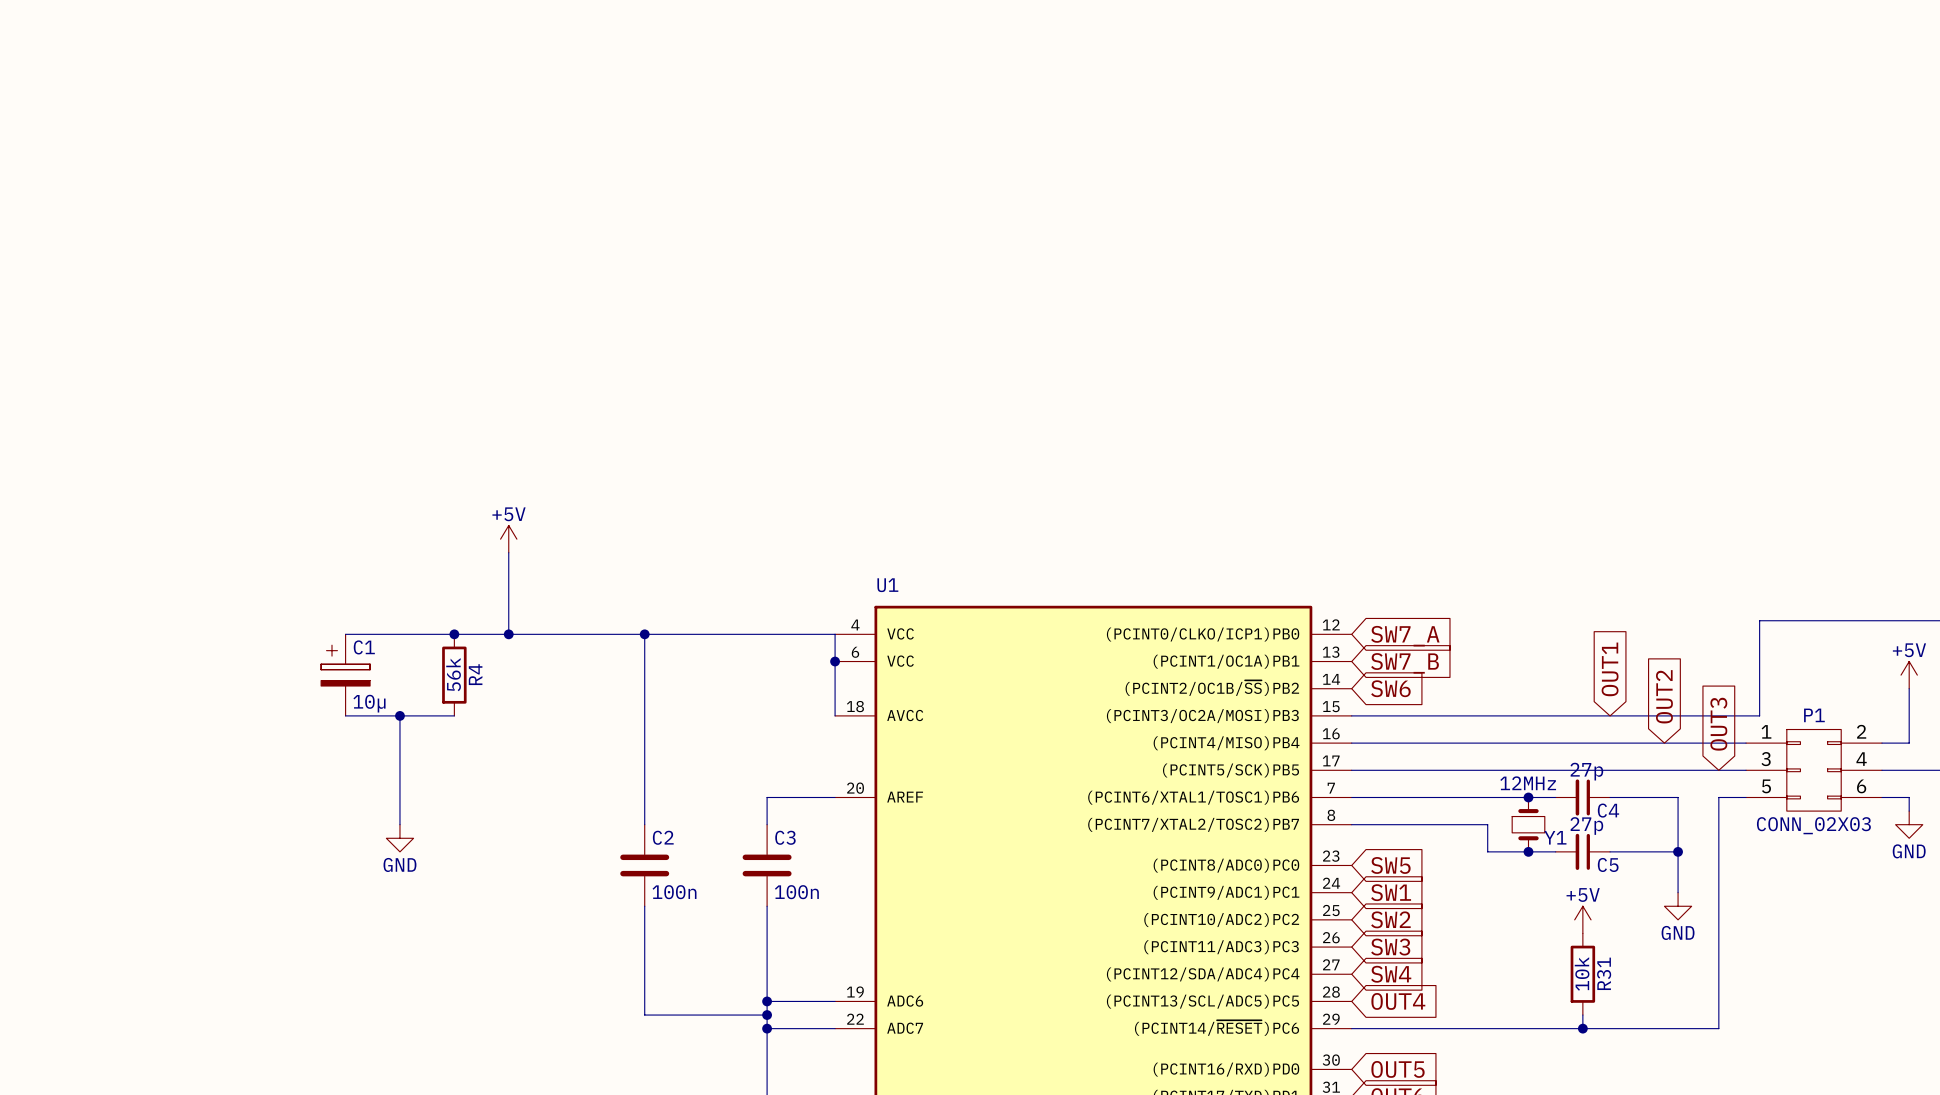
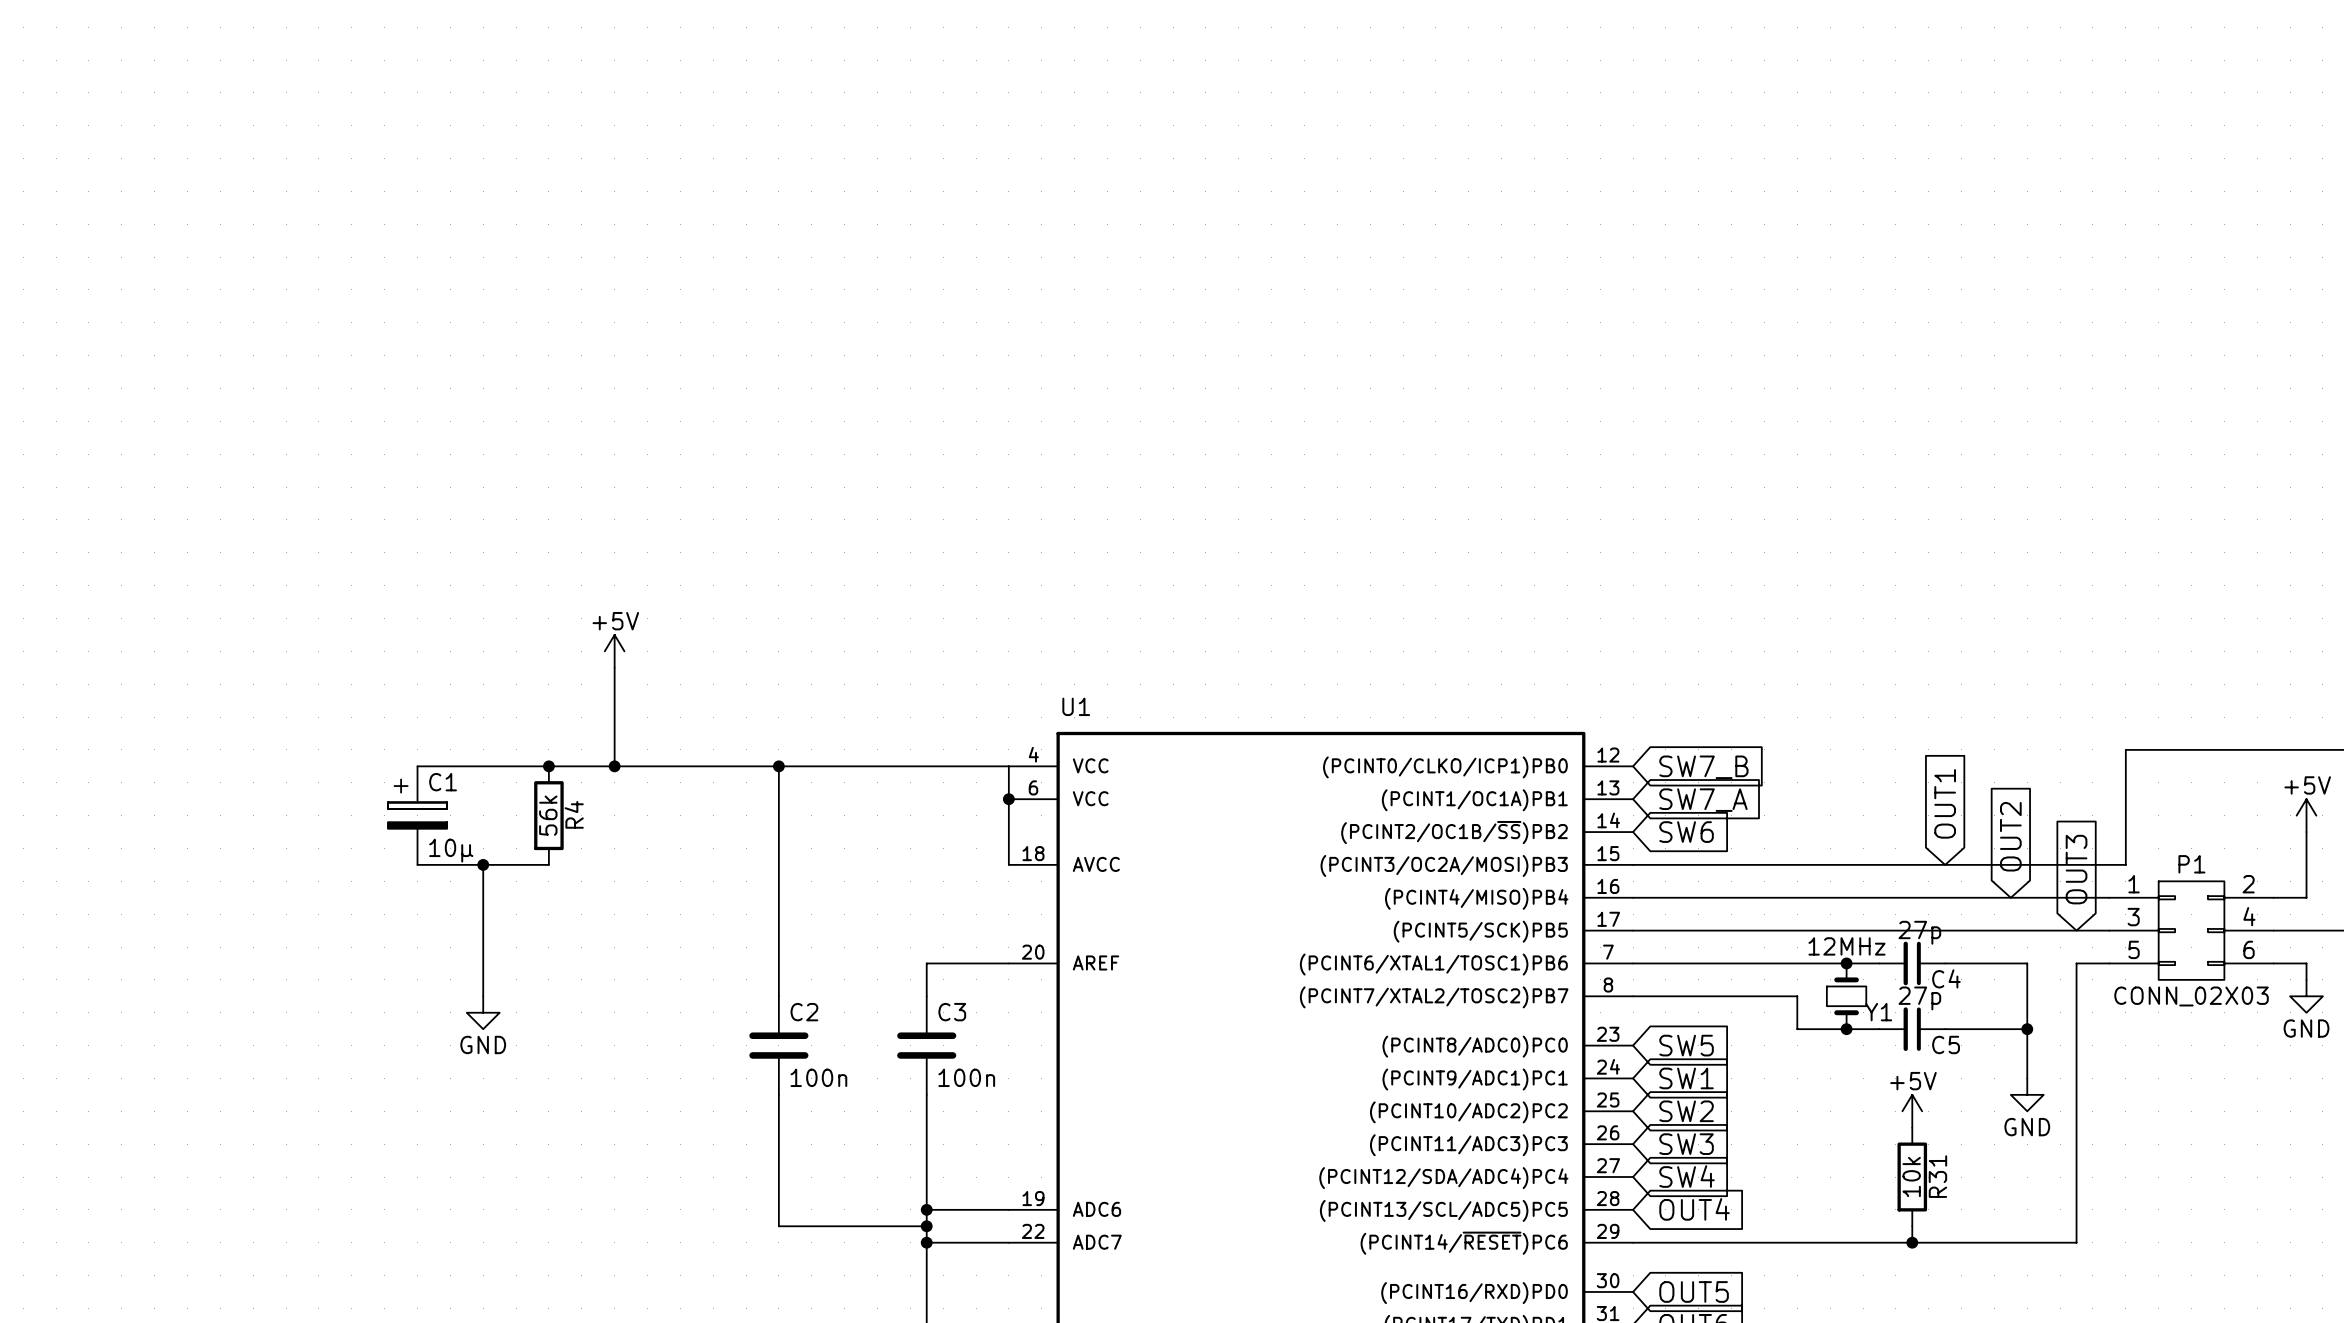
global label: SW7_A (1405, 636) -> SW7_B (1703, 767)
global label: SW7_B (1405, 663) -> SW7_A (1703, 800)

